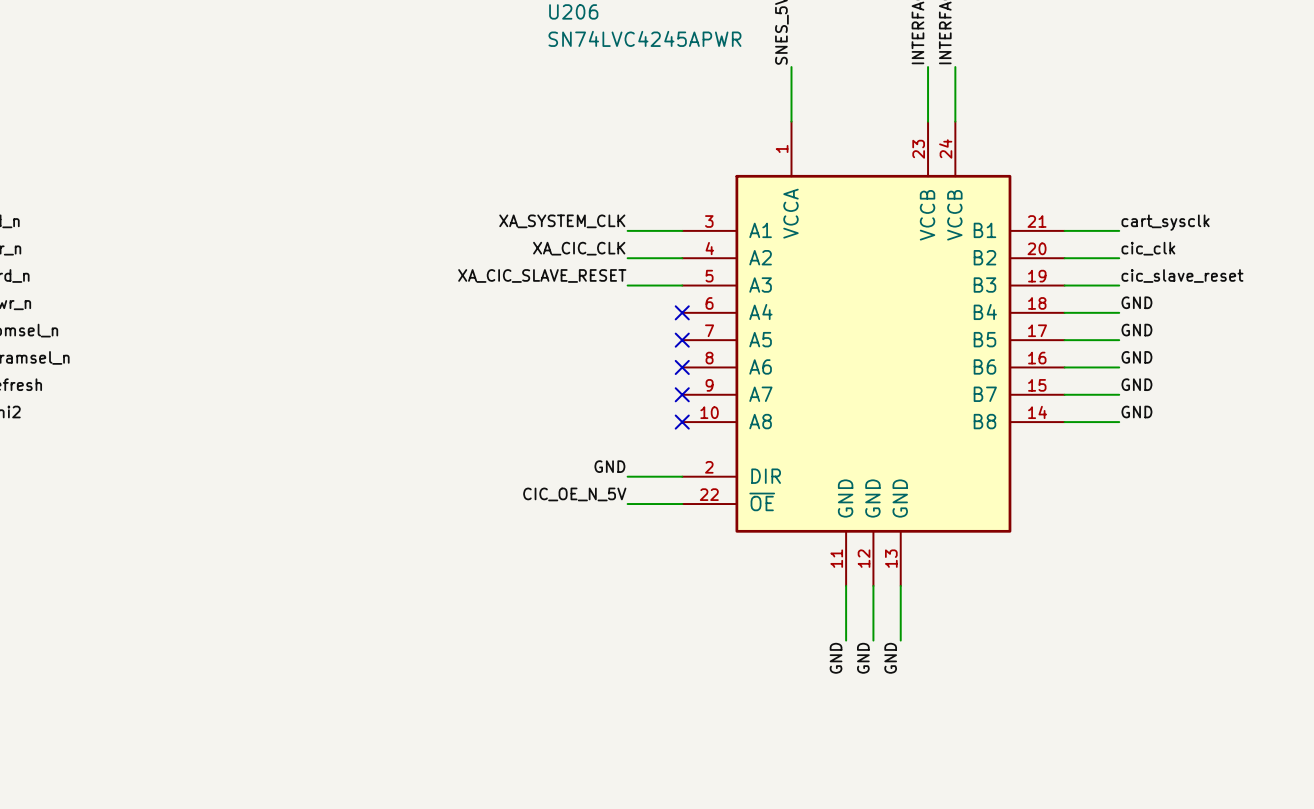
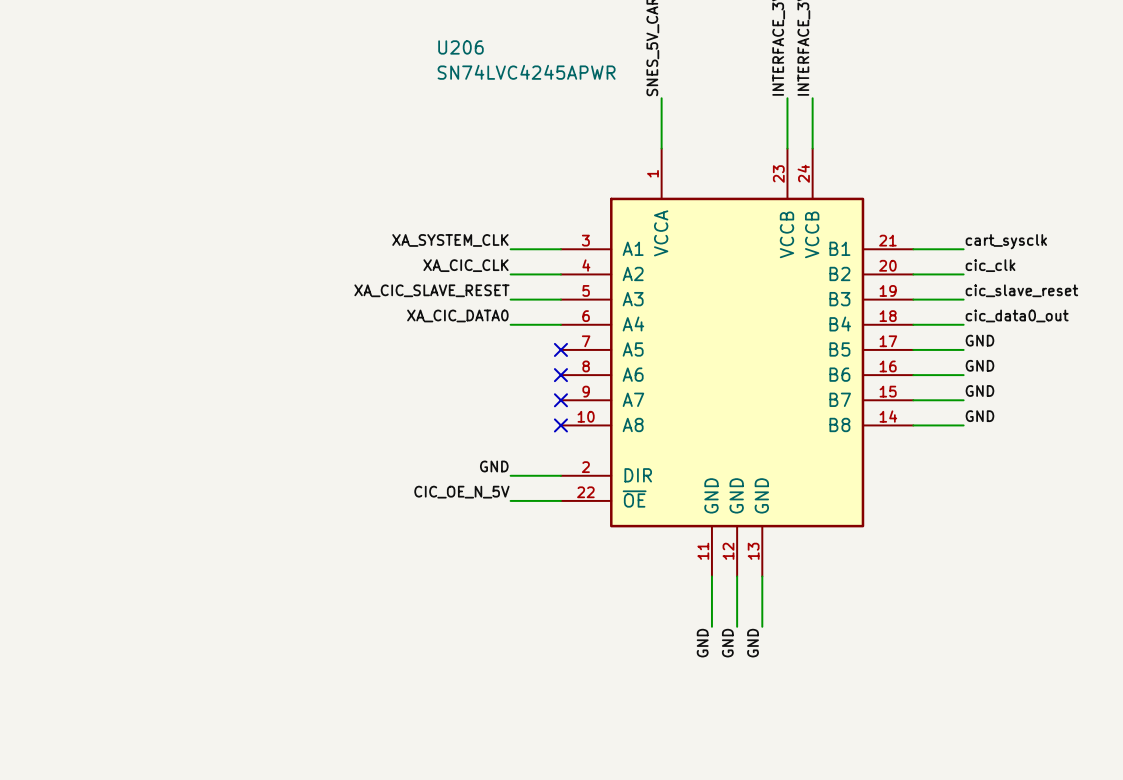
label: GND (1136, 302) -> cic_data0_out (1017, 315)
label: none -> XA_CIC_DATA0 (457, 315)
wire: none -> (510, 324) (560, 324)
no-connect mark: (682, 312) -> none

